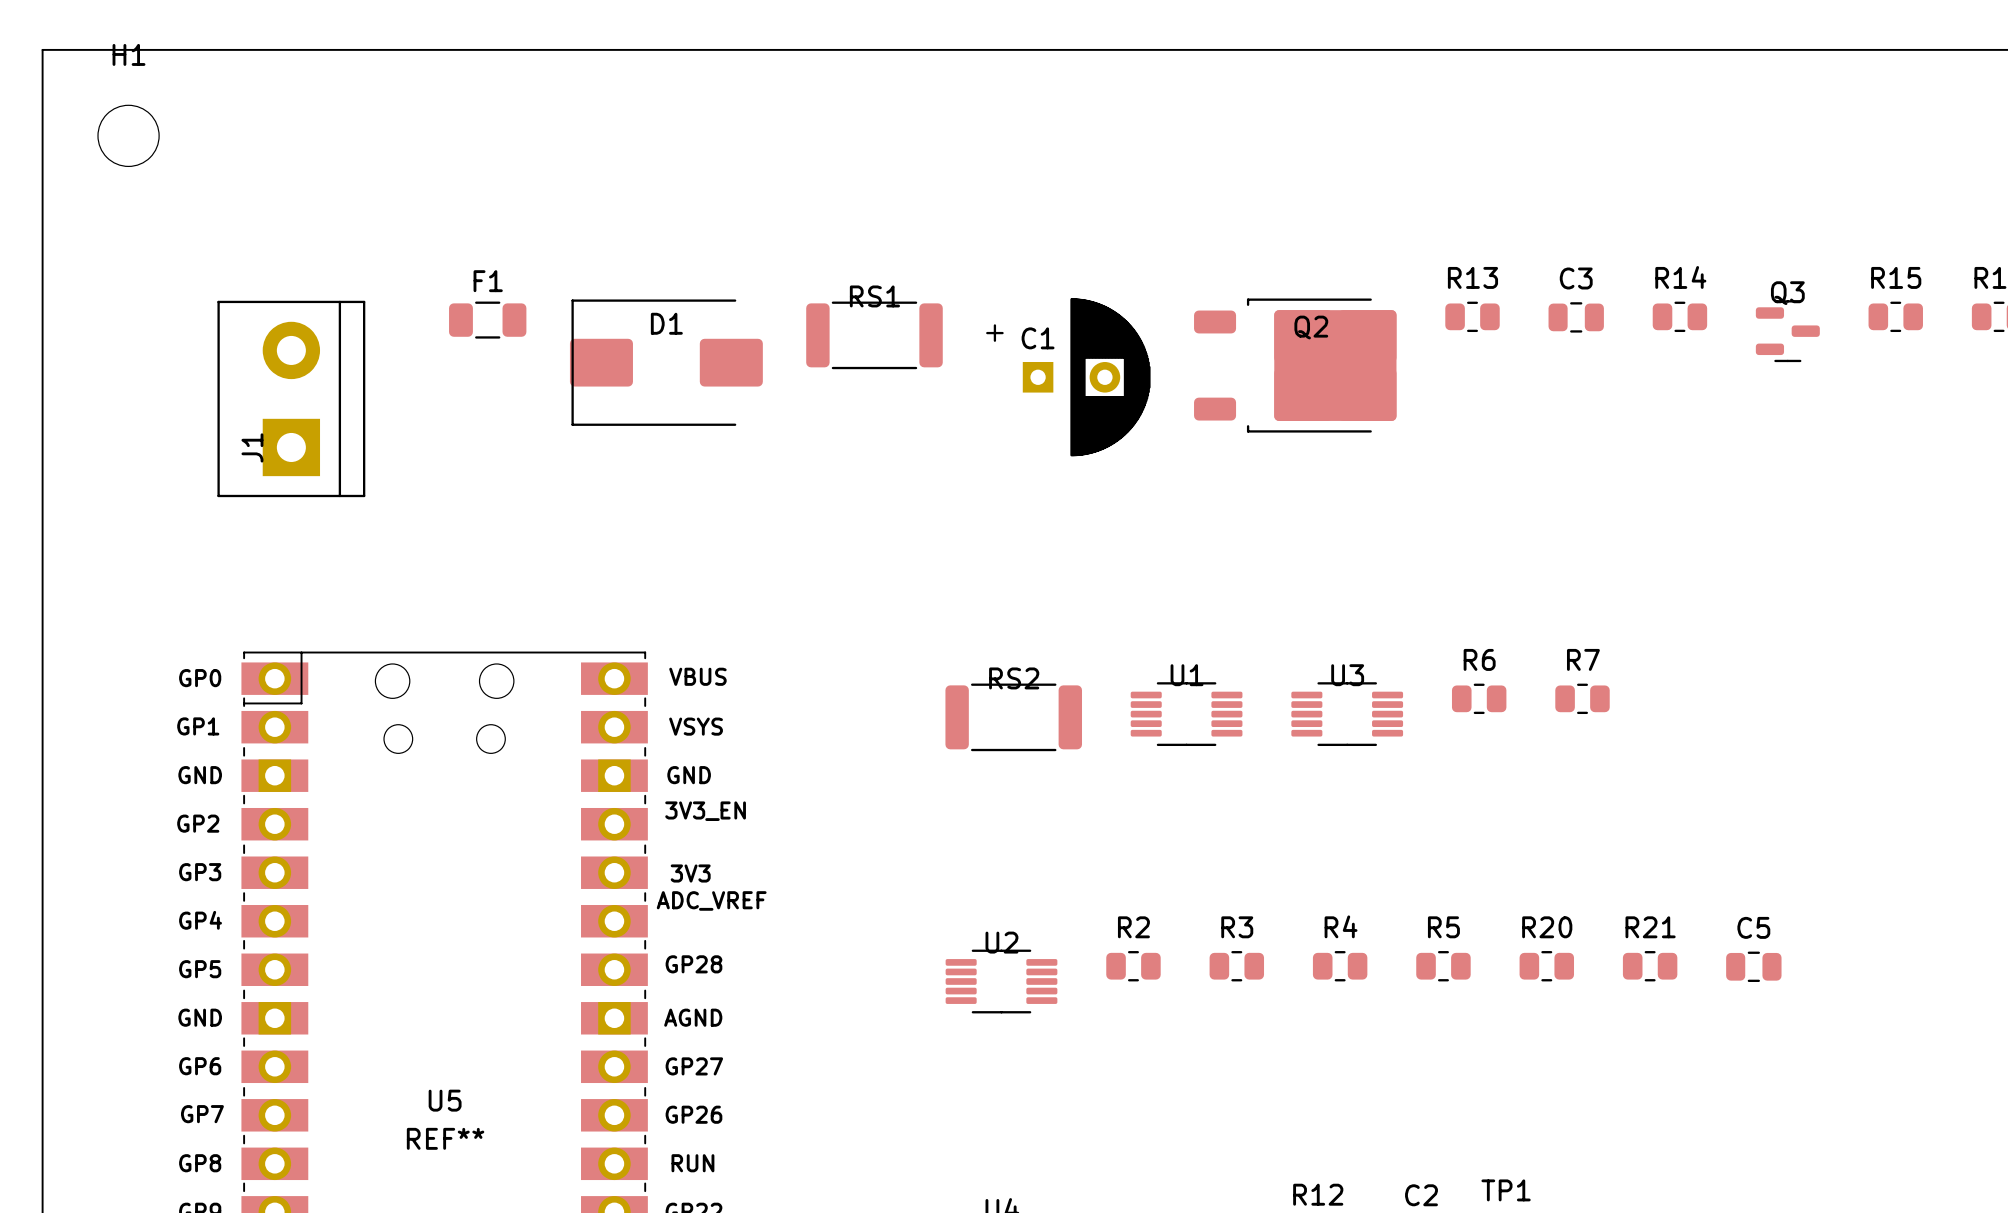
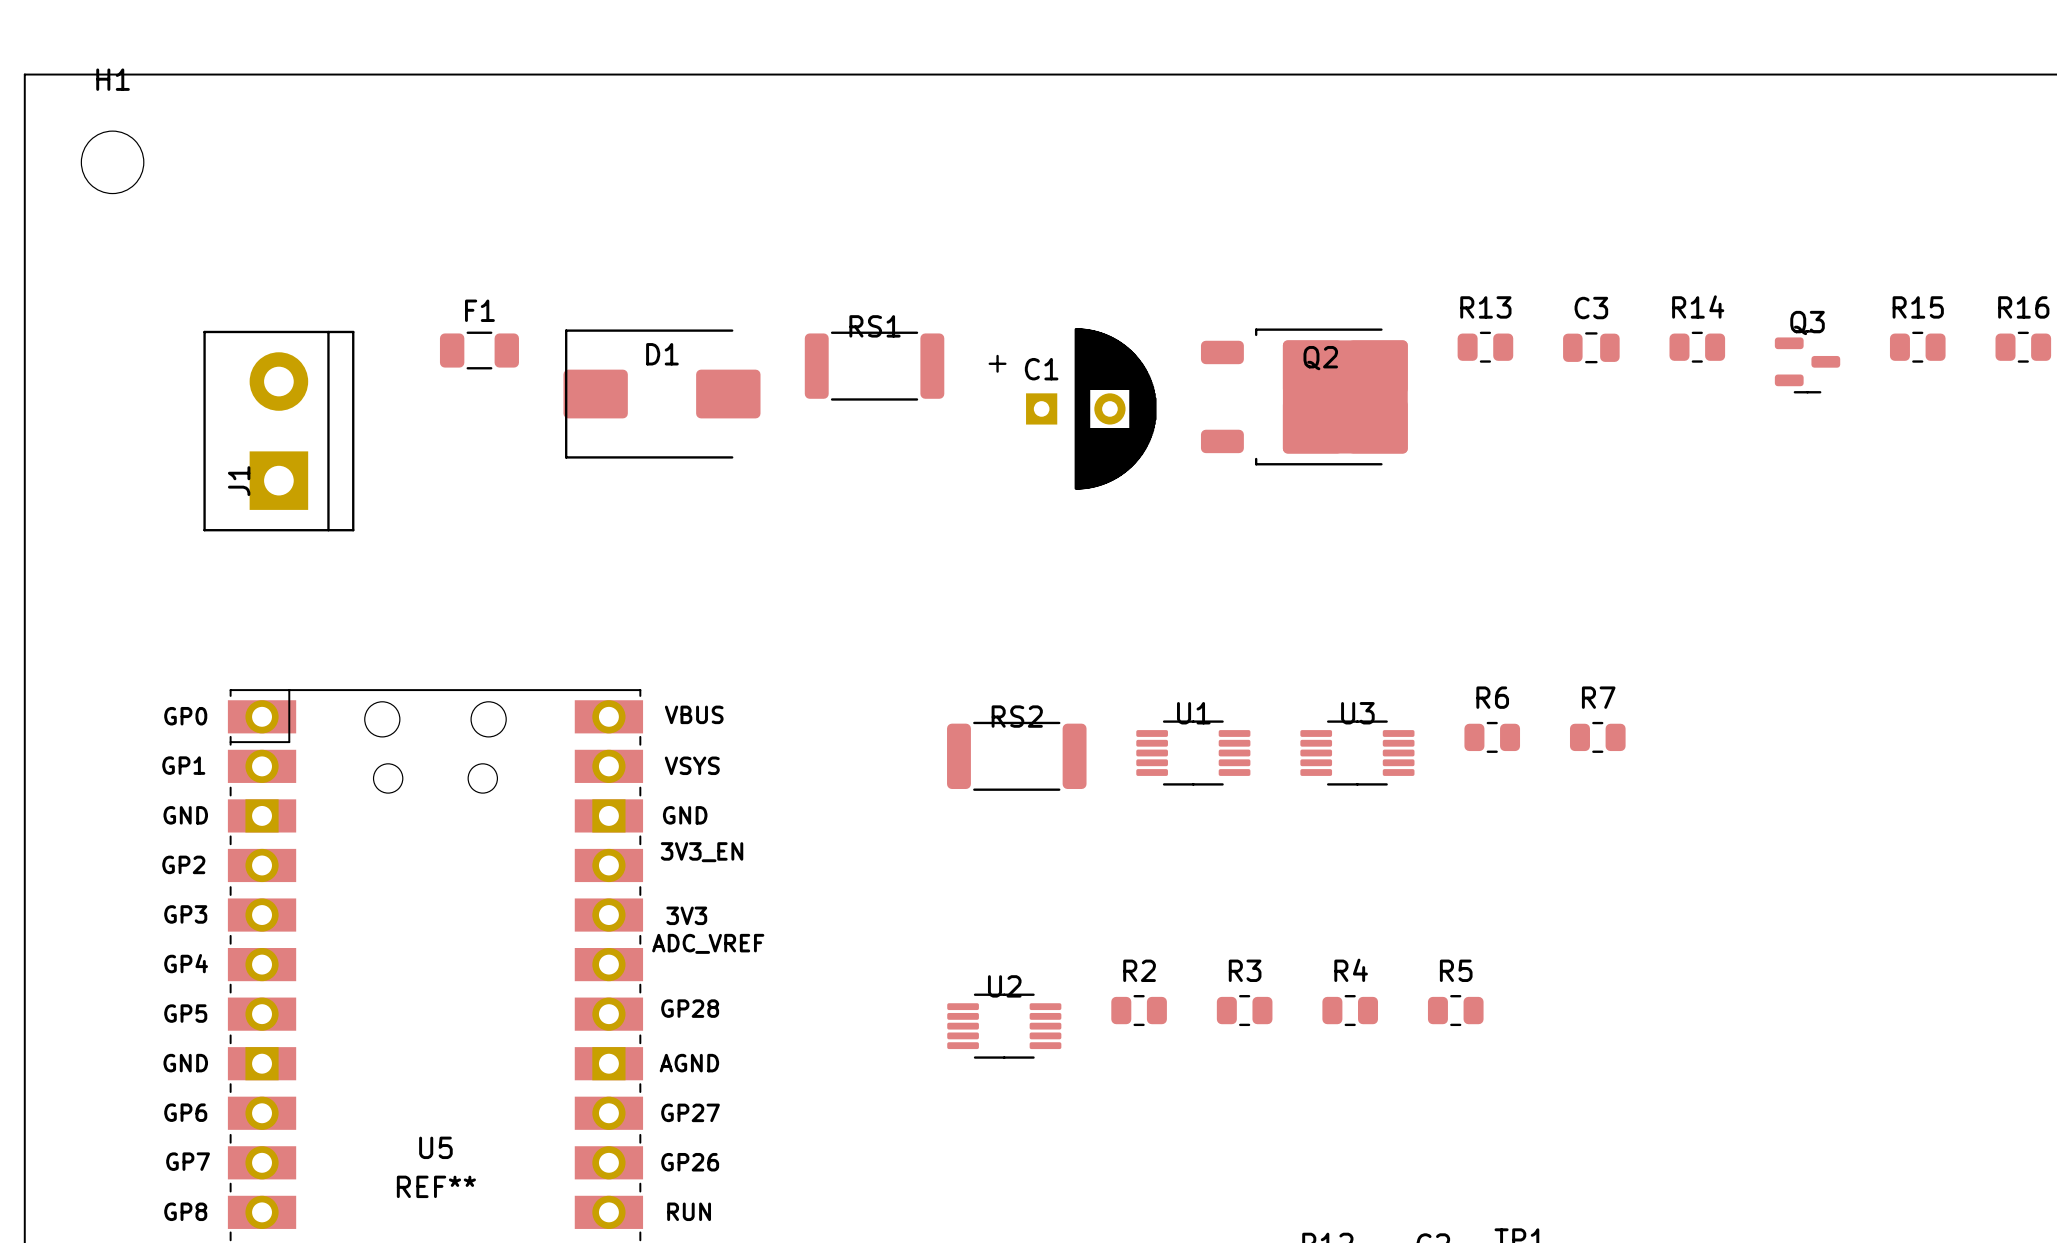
R20: (1546, 966) -> none
R21: (1650, 966) -> none
C5: (1753, 966) -> none

